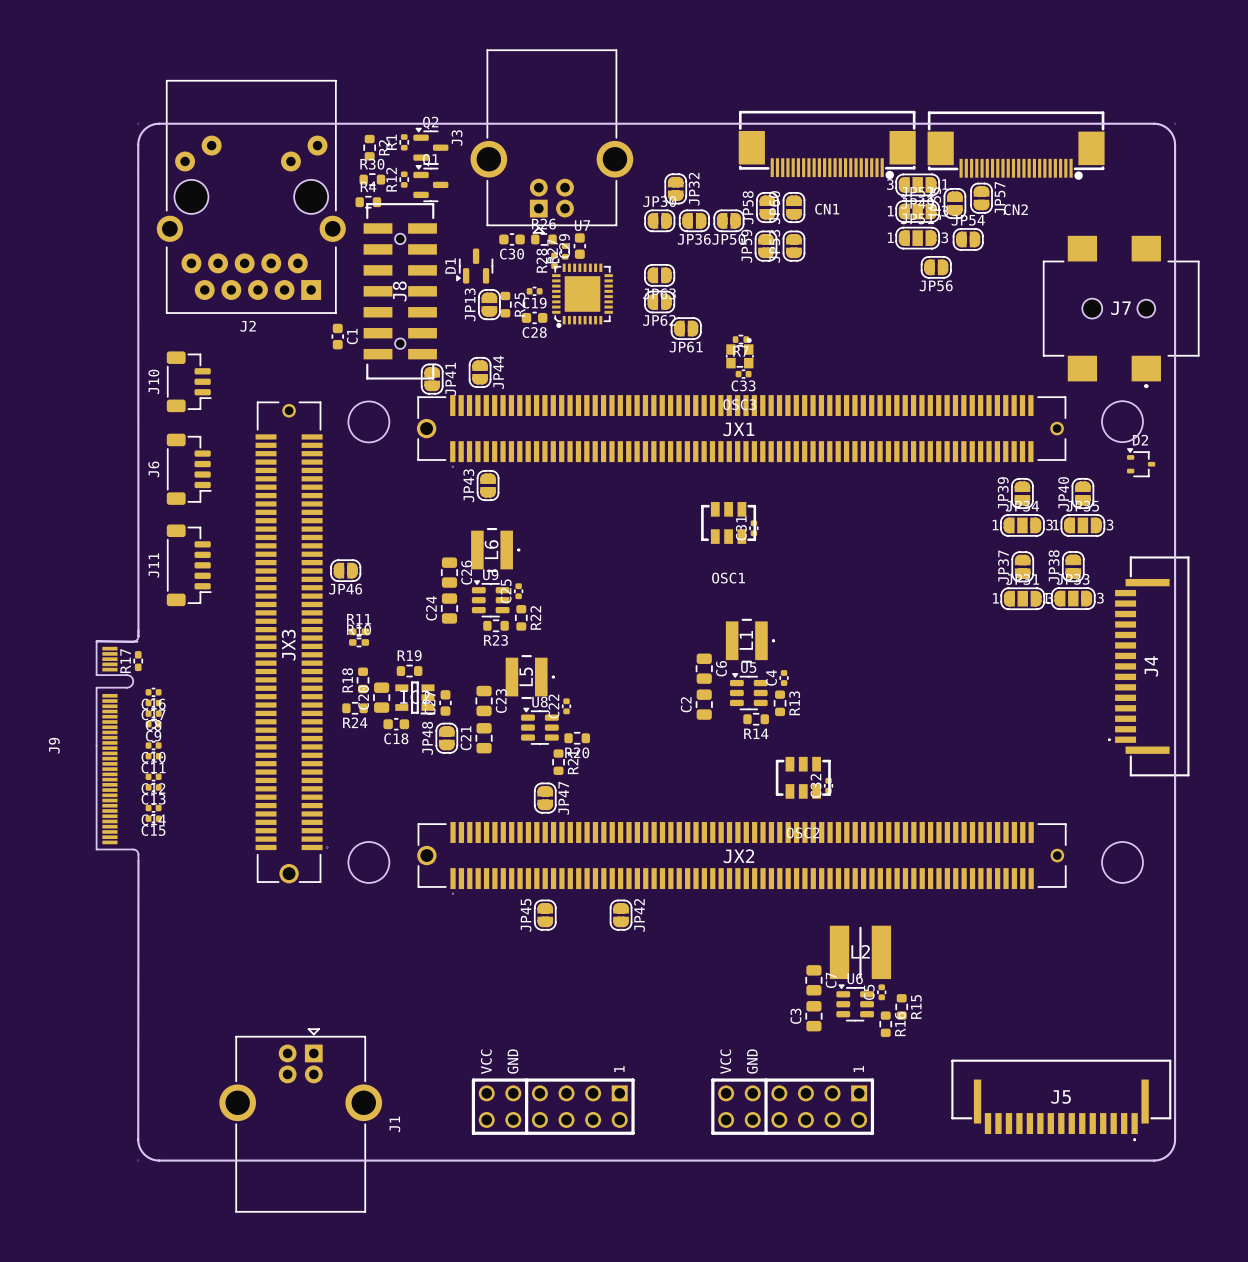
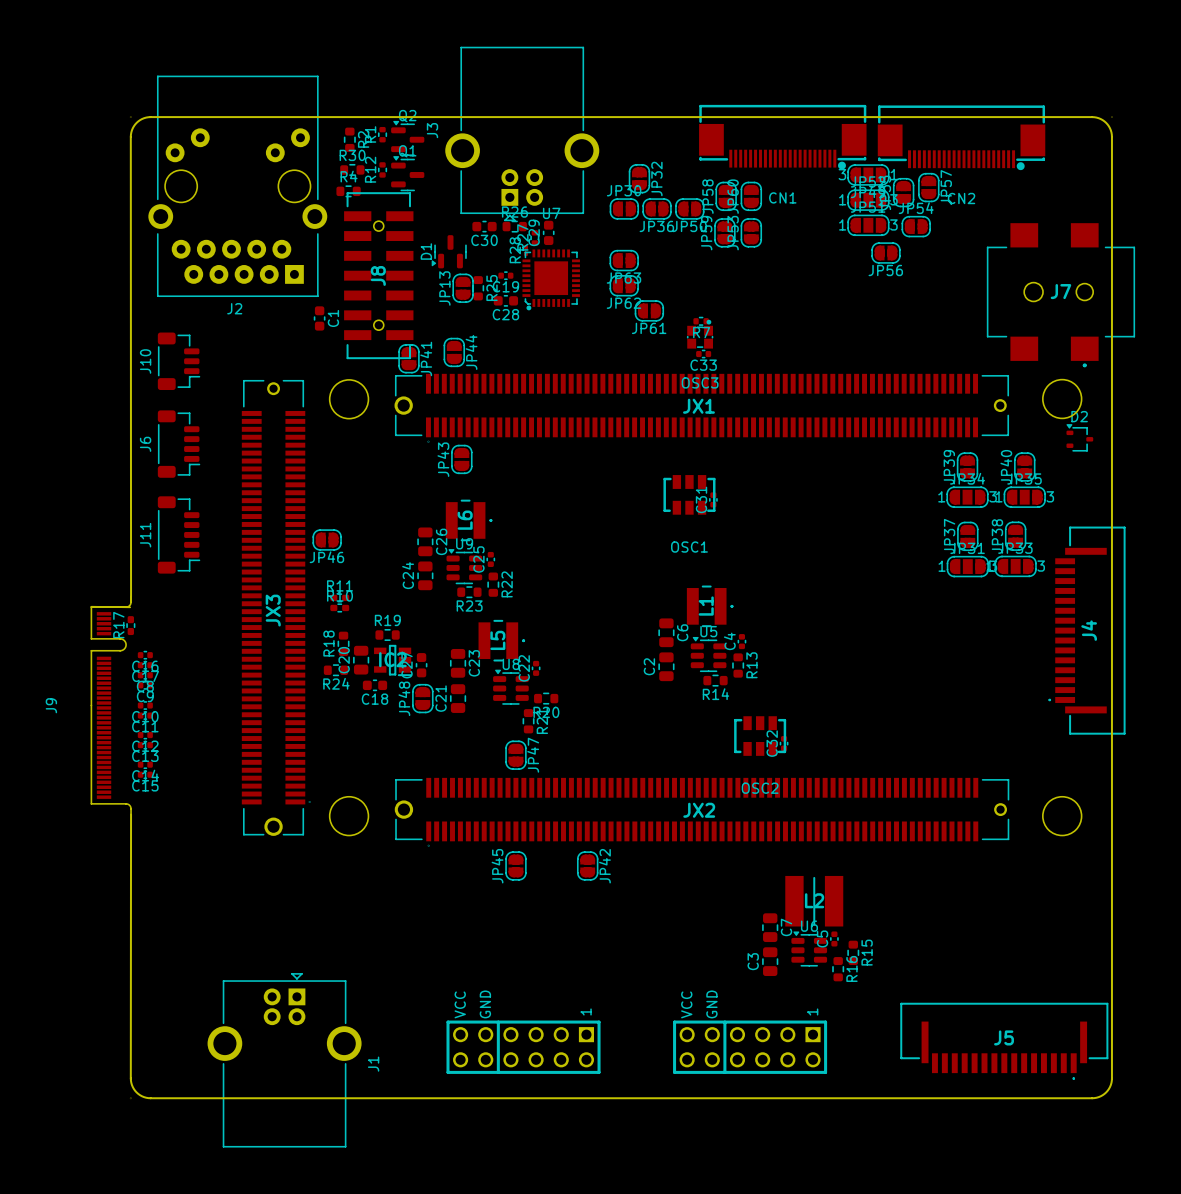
R28 footprint: [549, 252, 560, 269] -> [524, 245, 529, 256]

